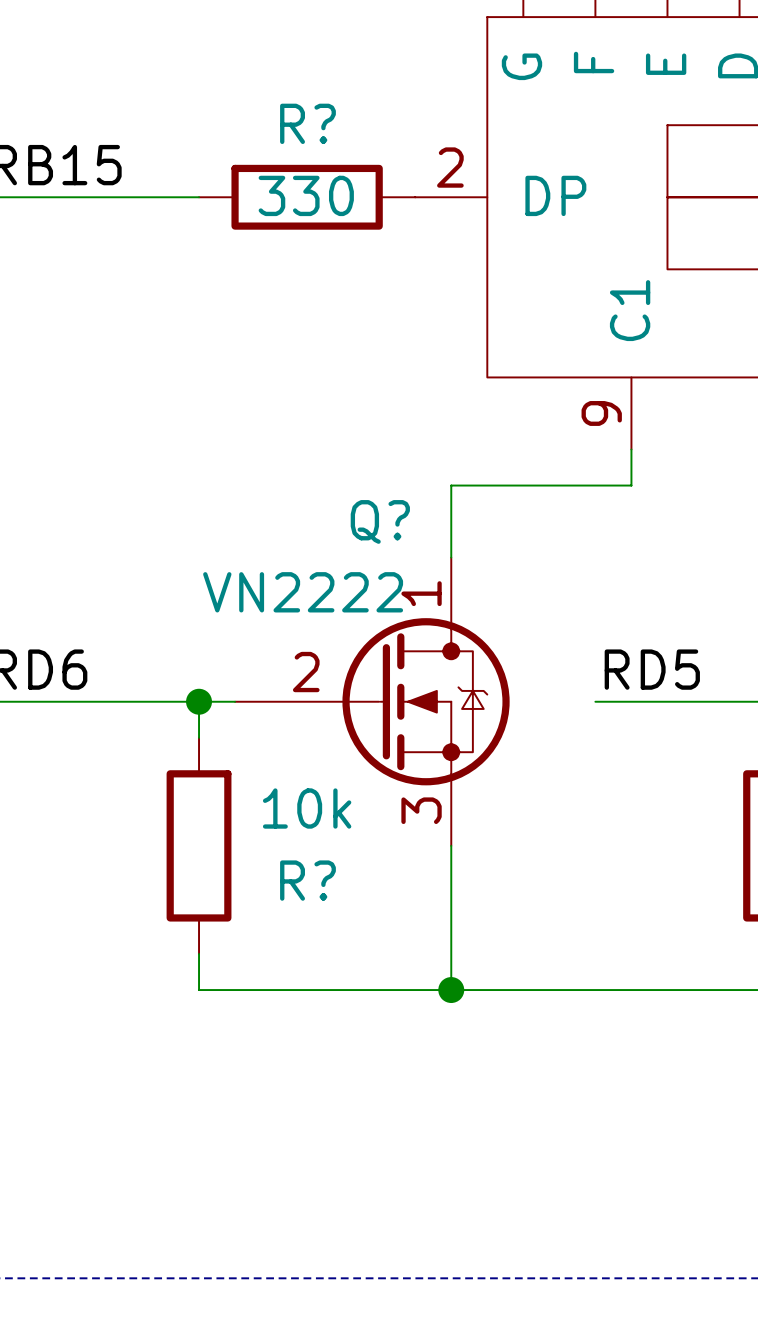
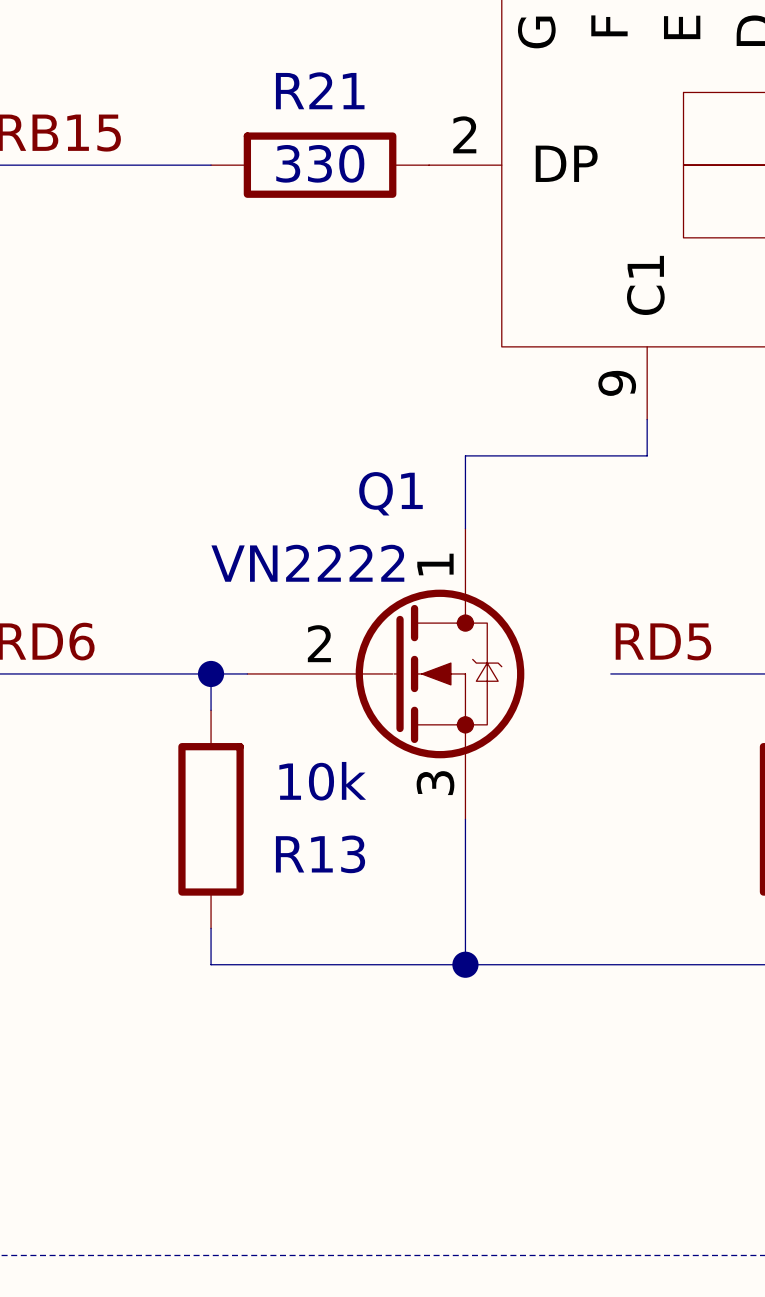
R? name: R? (307, 123) -> R21 (320, 90)
Q? name: Q? (380, 521) -> Q1 (390, 493)
R? name: R? (307, 880) -> R13 (320, 854)

